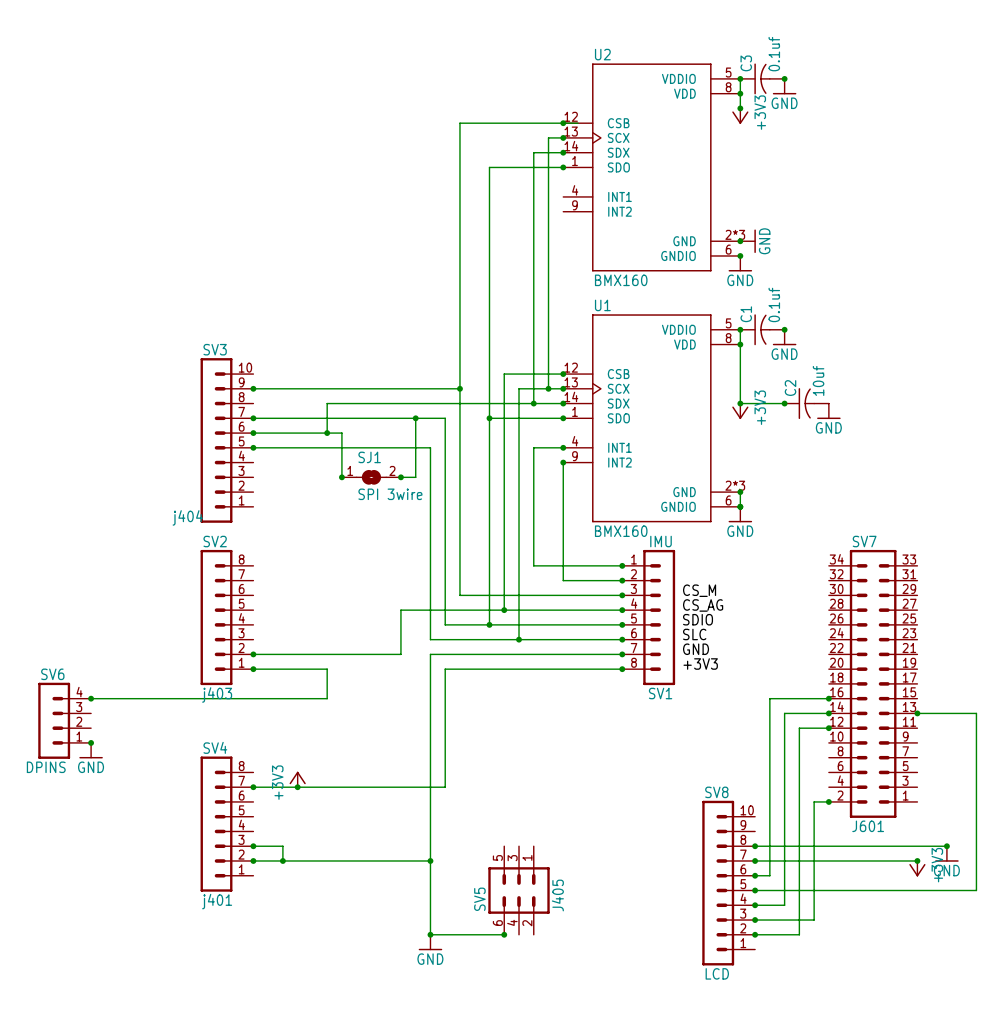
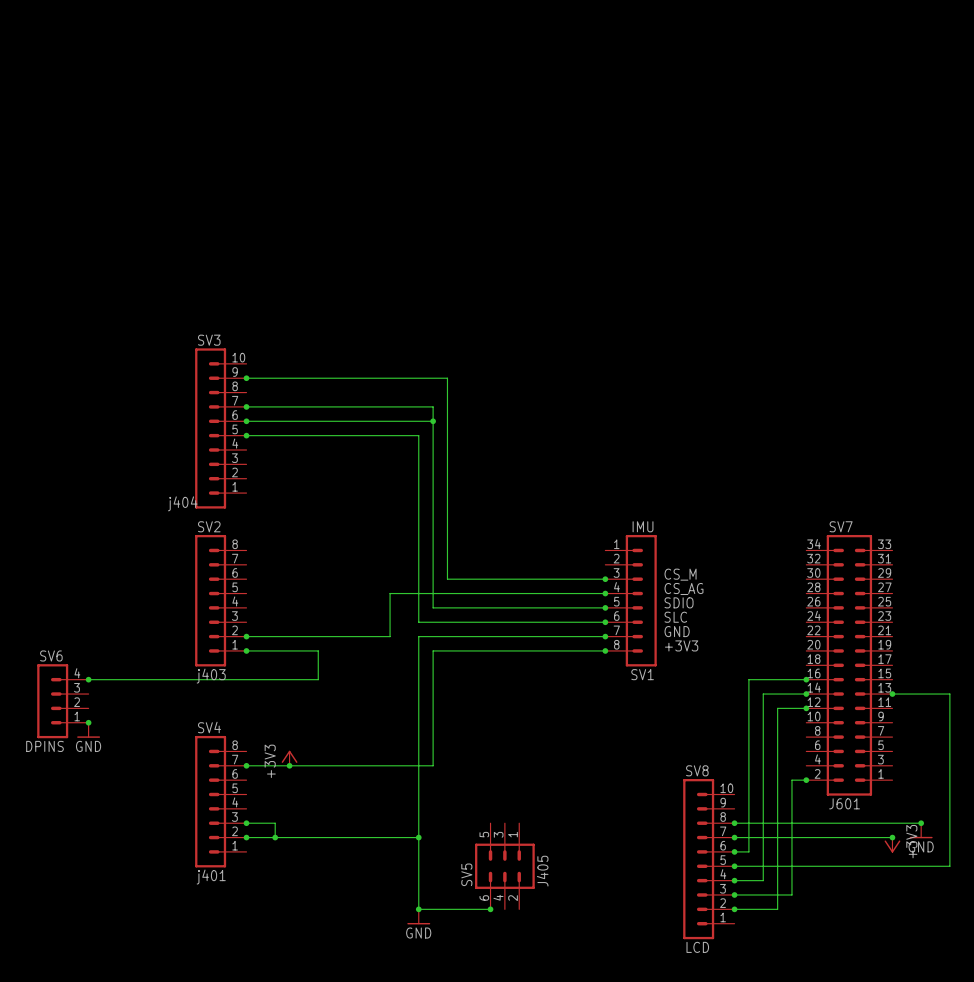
wire: (740, 78) (740, 108) -> none
junction: (740, 78) -> none
C3: 0.1uf (762, 78) -> none
junction: (784, 78) -> none
power symbol: GND (784, 86) -> none
junction: (740, 93) -> none
junction: (740, 108) -> none
power symbol: +3V3 (740, 116) -> none
junction: (563, 123) -> none
wire: (578, 123) (459, 123) (459, 388) -> none
wire: (563, 137) (548, 137) (548, 388) -> none
junction: (563, 137) -> none
wire: (563, 152) (533, 152) (533, 403) -> none
junction: (563, 152) -> none
wire: (563, 167) (489, 167) (489, 624) -> none
junction: (563, 167) -> none
U2: BMX160 (651, 167) -> none
junction: (740, 241) -> none
power symbol: GND (748, 241) -> none
junction: (740, 255) -> none
power symbol: GND (740, 263) -> none
wire: (740, 329) (740, 403) (784, 403) -> none
junction: (740, 329) -> none
C1: 0.1uf (762, 329) -> none
junction: (784, 329) -> none
power symbol: GND (784, 337) -> none
junction: (740, 344) -> none
wire: (563, 374) (504, 374) (504, 610) -> none
junction: (563, 374) -> none
junction: (459, 388) -> none
junction: (548, 388) -> none
wire: (563, 388) (519, 388) (519, 639) -> none
junction: (563, 388) -> none
junction: (533, 403) -> none
wire: (563, 403) (327, 403) (327, 433) -> none
junction: (563, 403) -> none
junction: (740, 403) -> none
junction: (784, 403) -> none
C2: 10uf (806, 403) -> none
power symbol: +3V3 (740, 411) -> none
power symbol: GND (828, 411) -> none
wire: (415, 418) (415, 477) (400, 477) -> none
junction: (415, 418) -> none
wire: (489, 418) (563, 418) -> none
junction: (489, 418) -> none
junction: (563, 418) -> none
U1: BMX160 (651, 418) -> none
junction: (327, 433) -> none
wire: (341, 433) (341, 477) -> (332, 421) (433, 421)
junction: none -> (433, 421)
wire: (563, 447) (533, 447) (533, 565) (622, 565) -> none
junction: (563, 447) -> none
wire: (563, 462) (563, 580) (622, 580) -> none
junction: (563, 462) -> none
junction: (341, 477) -> none
SJ1: SPI 3wire (371, 477) -> none
junction: (400, 477) -> none
wire: (740, 492) (740, 506) -> none
junction: (740, 492) -> none
junction: (740, 506) -> none
power symbol: GND (740, 514) -> none
junction: (622, 565) -> none
junction: (622, 580) -> none
junction: (504, 610) -> none
junction: (489, 624) -> none
junction: (519, 639) -> none

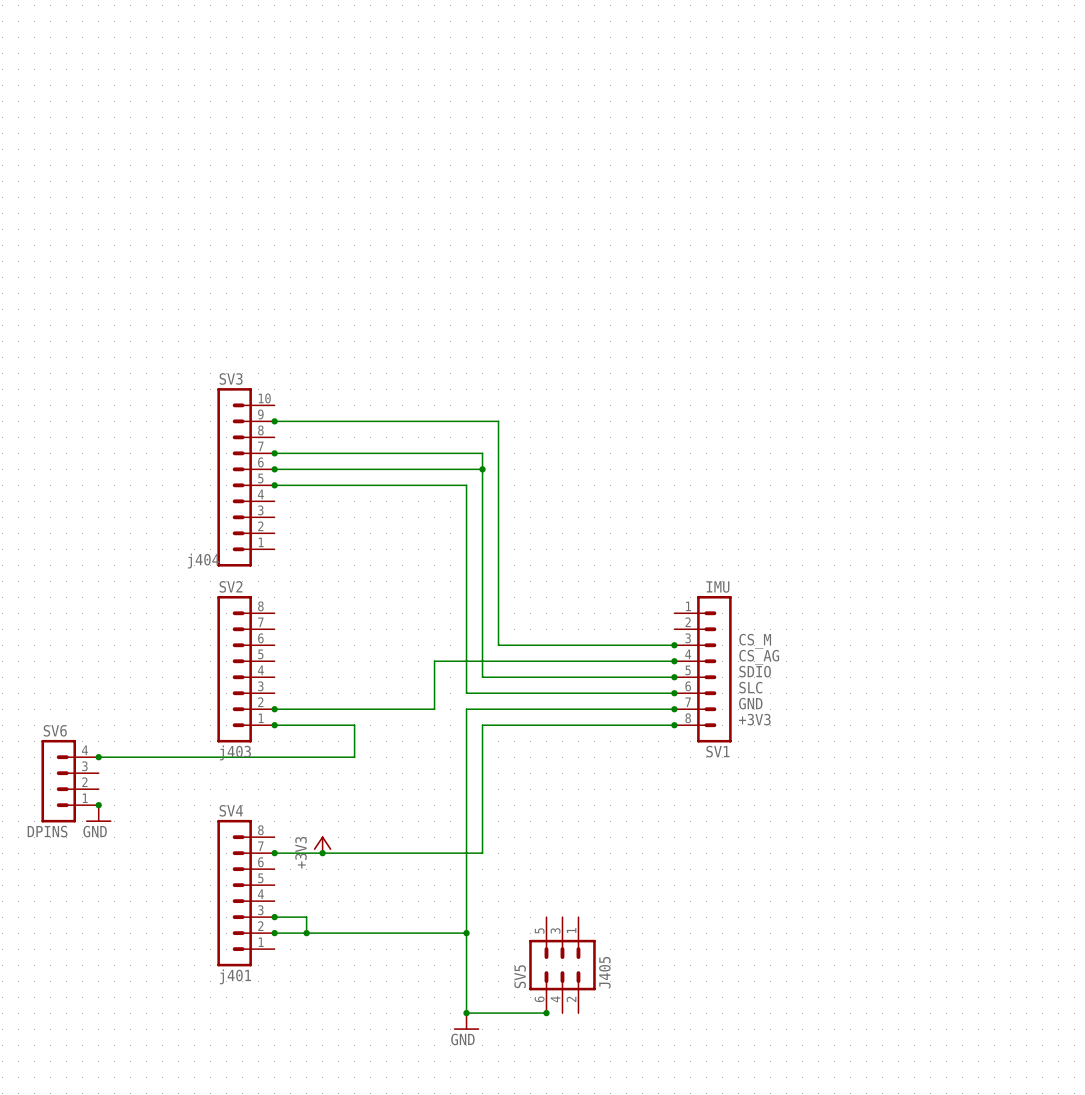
SV7: J601 (849, 665) -> none
wire: (806, 679) (748, 679) (748, 851) (734, 851) -> none
junction: (806, 679) -> none
wire: (806, 694) (763, 694) (763, 880) (734, 880) -> none
junction: (806, 694) -> none
wire: (892, 694) (949, 694) (949, 866) (734, 866) -> none
junction: (892, 694) -> none
wire: (806, 708) (777, 708) (777, 909) (734, 909) -> none
junction: (806, 708) -> none
wire: (806, 780) (791, 780) (791, 894) (734, 894) -> none
junction: (806, 780) -> none
wire: (734, 823) (921, 823) -> none
junction: (734, 823) -> none
junction: (921, 823) -> none
power symbol: GND (921, 830) -> none
wire: (734, 837) (892, 837) -> none
junction: (734, 837) -> none
junction: (892, 837) -> none
power symbol: +3V3 (892, 845) -> none
junction: (734, 851) -> none
SV8: LCD (708, 859) -> none
junction: (734, 866) -> none
junction: (734, 880) -> none
junction: (734, 894) -> none
junction: (734, 909) -> none

